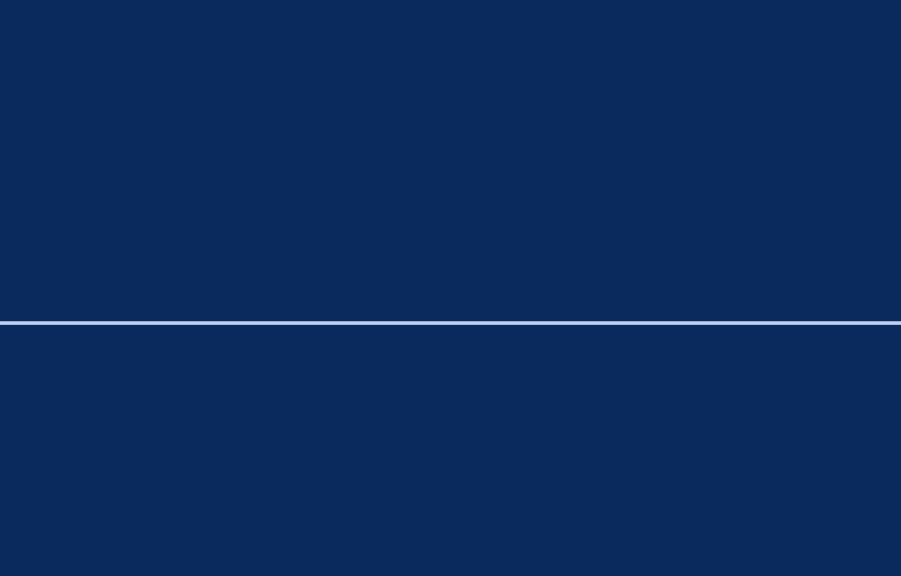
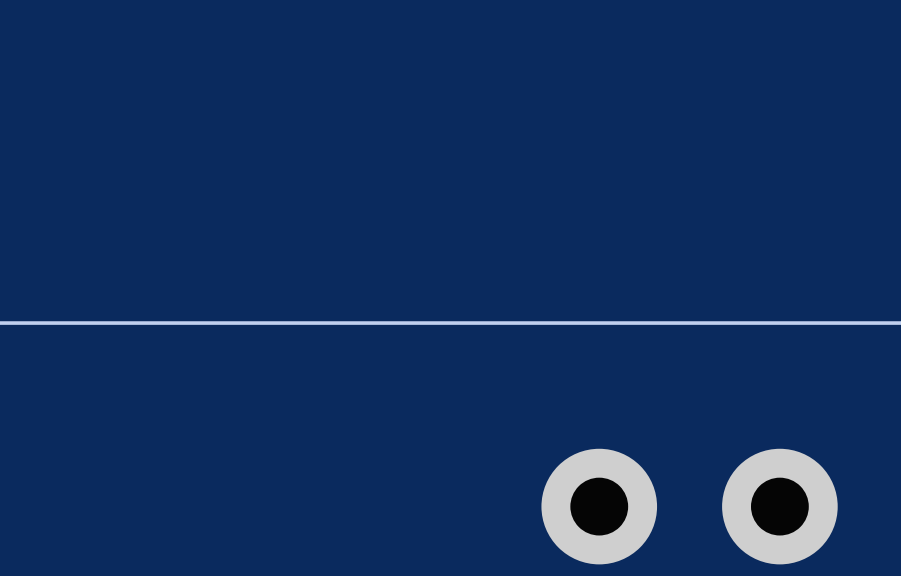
part: none -> (689, 506)

